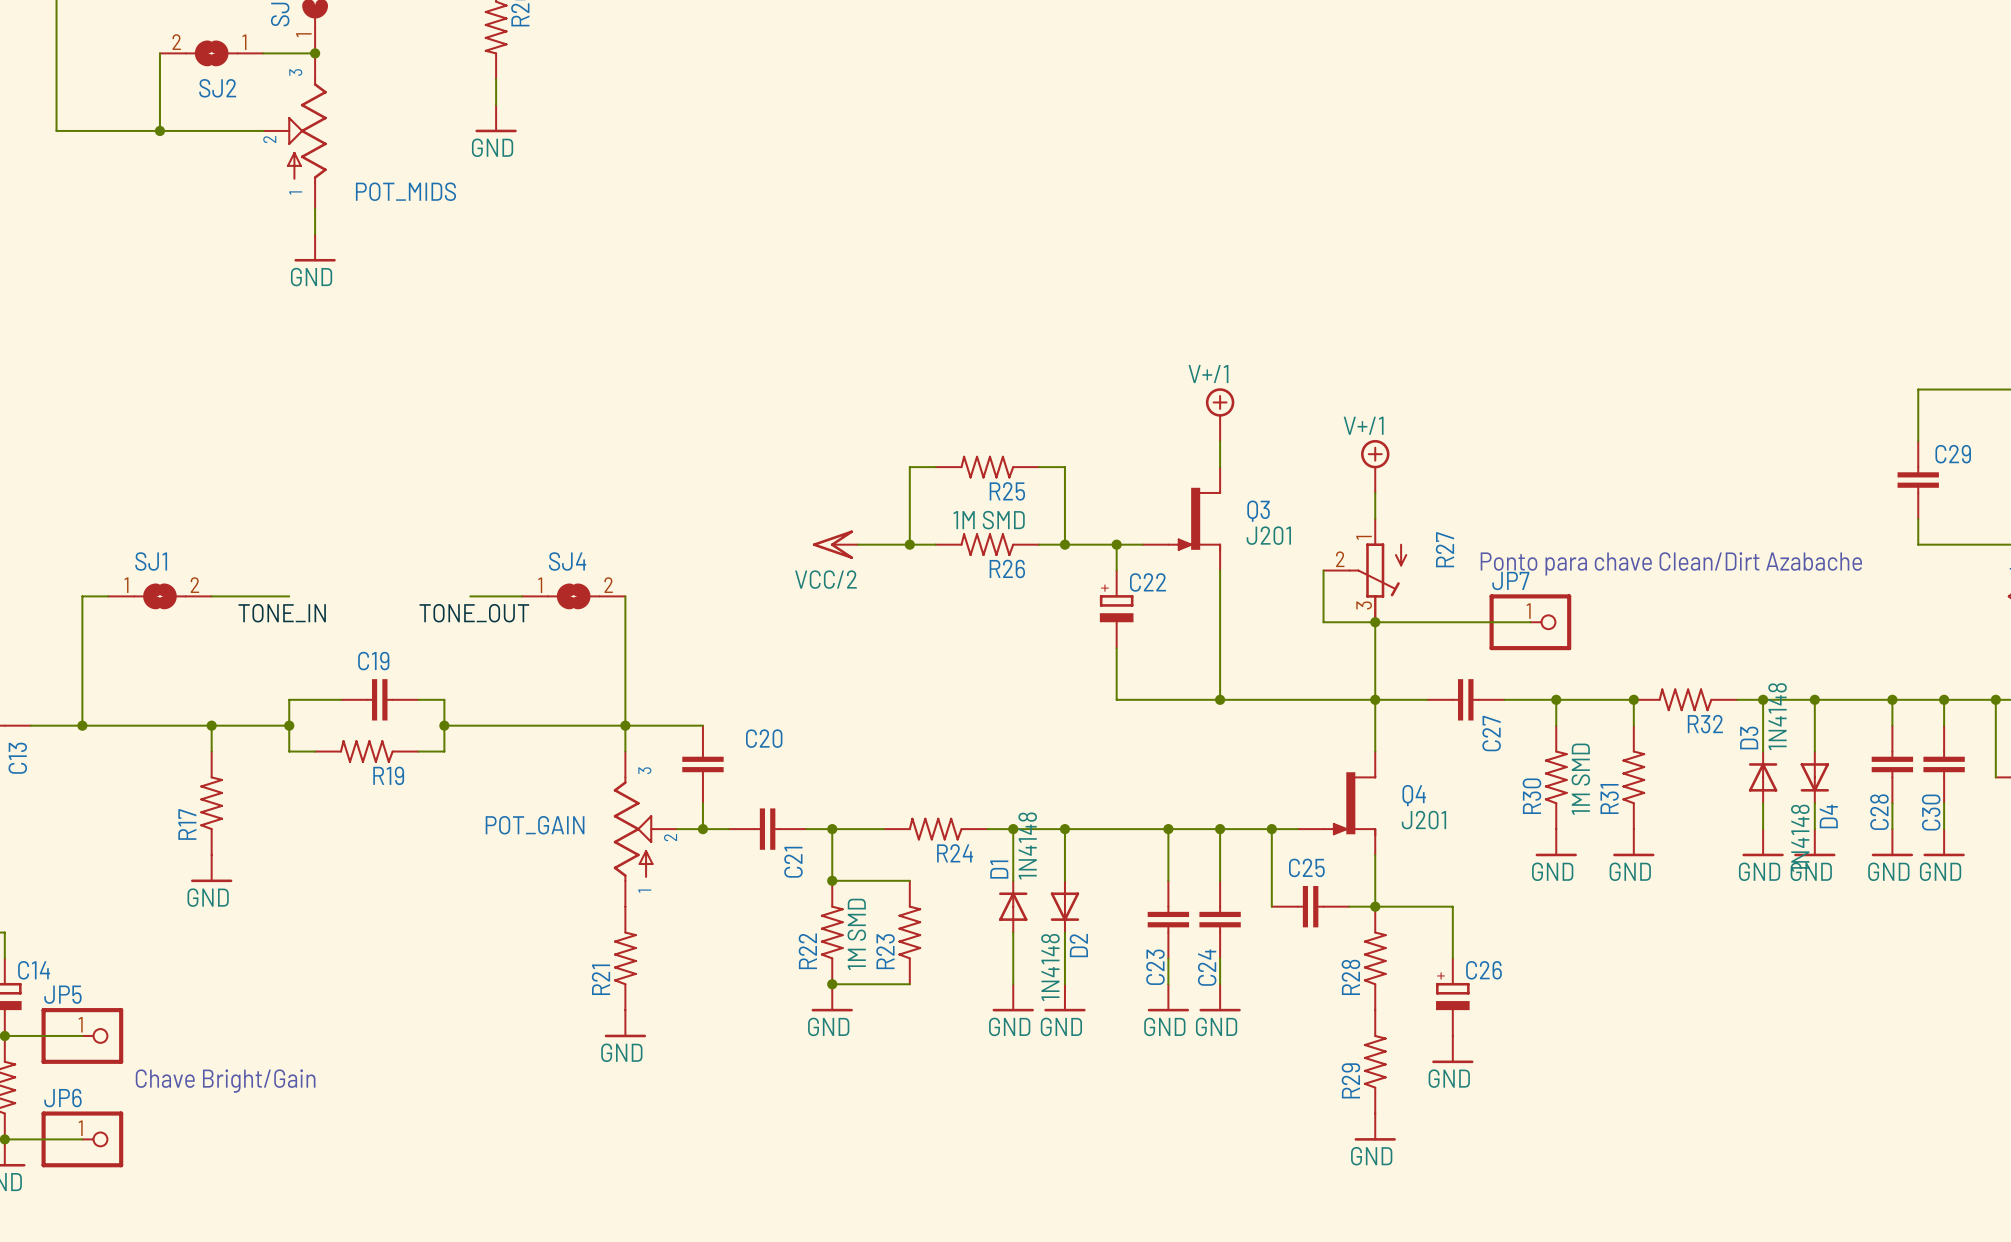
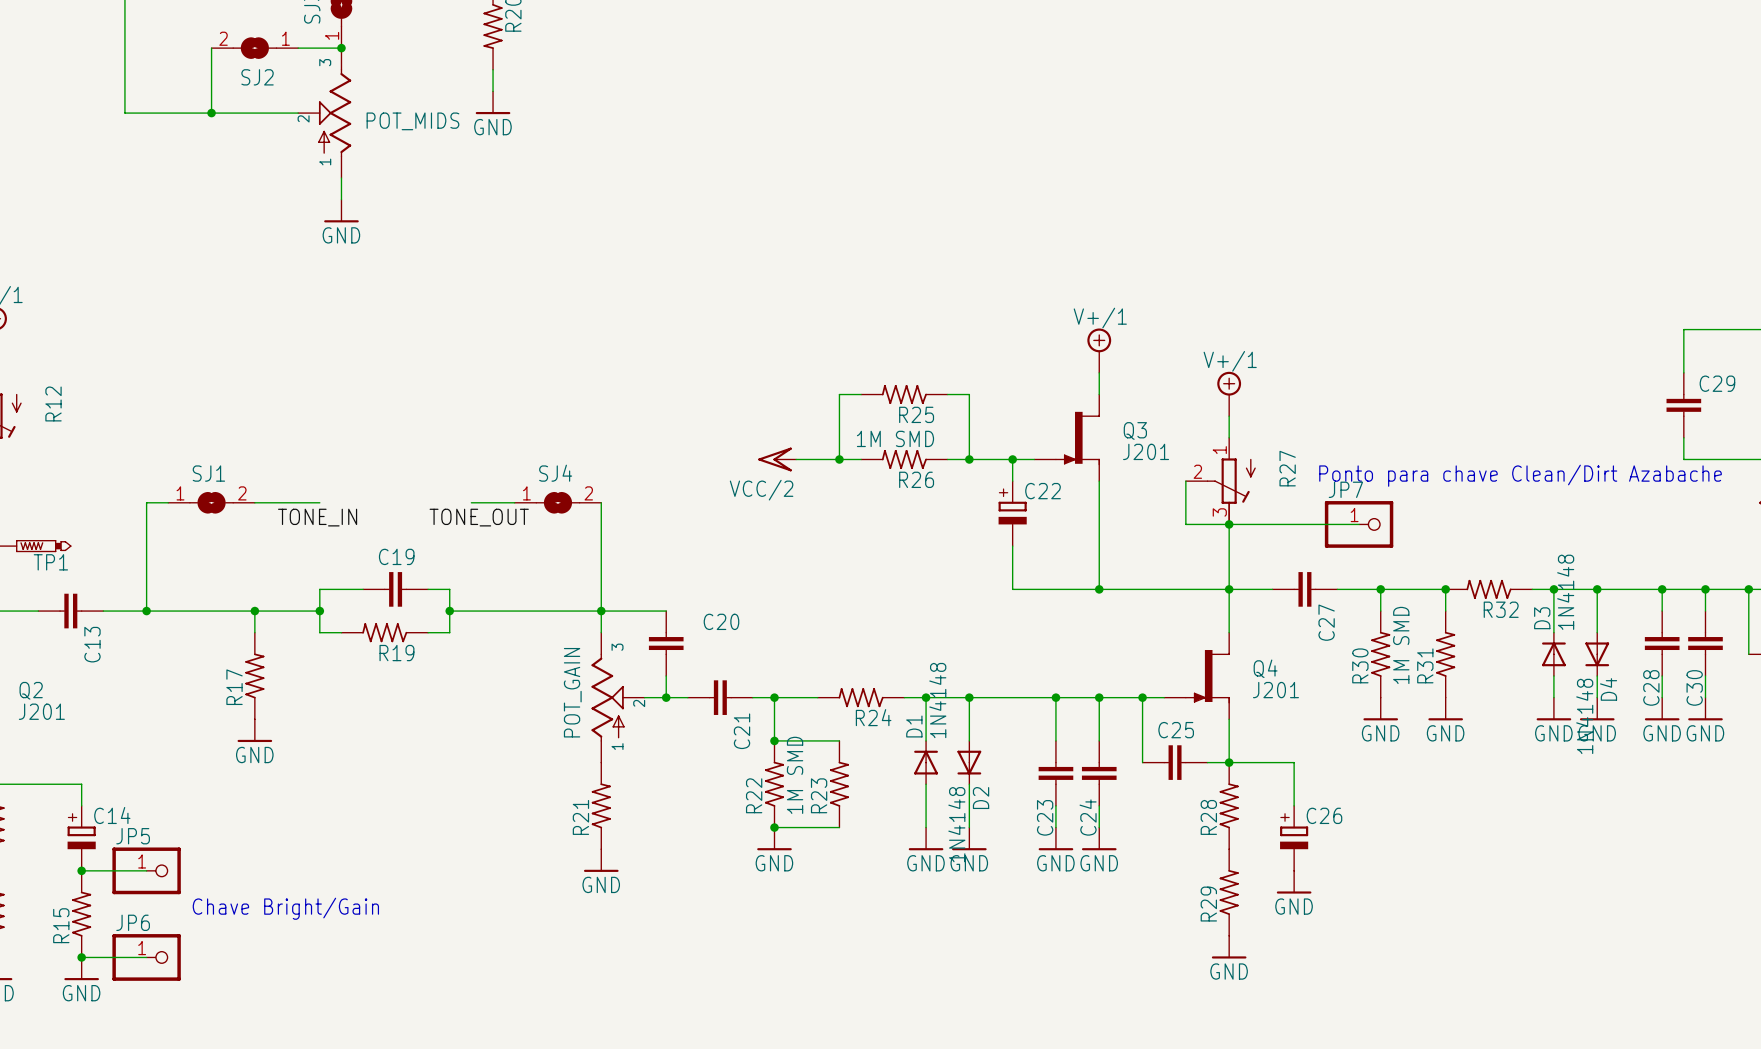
POT_MIDS name position: POT_MIDS (405, 191) -> POT_MIDS (412, 121)
POT_GAIN name rotation: 0° (535, 825) -> 90° counterclockwise (572, 692)

